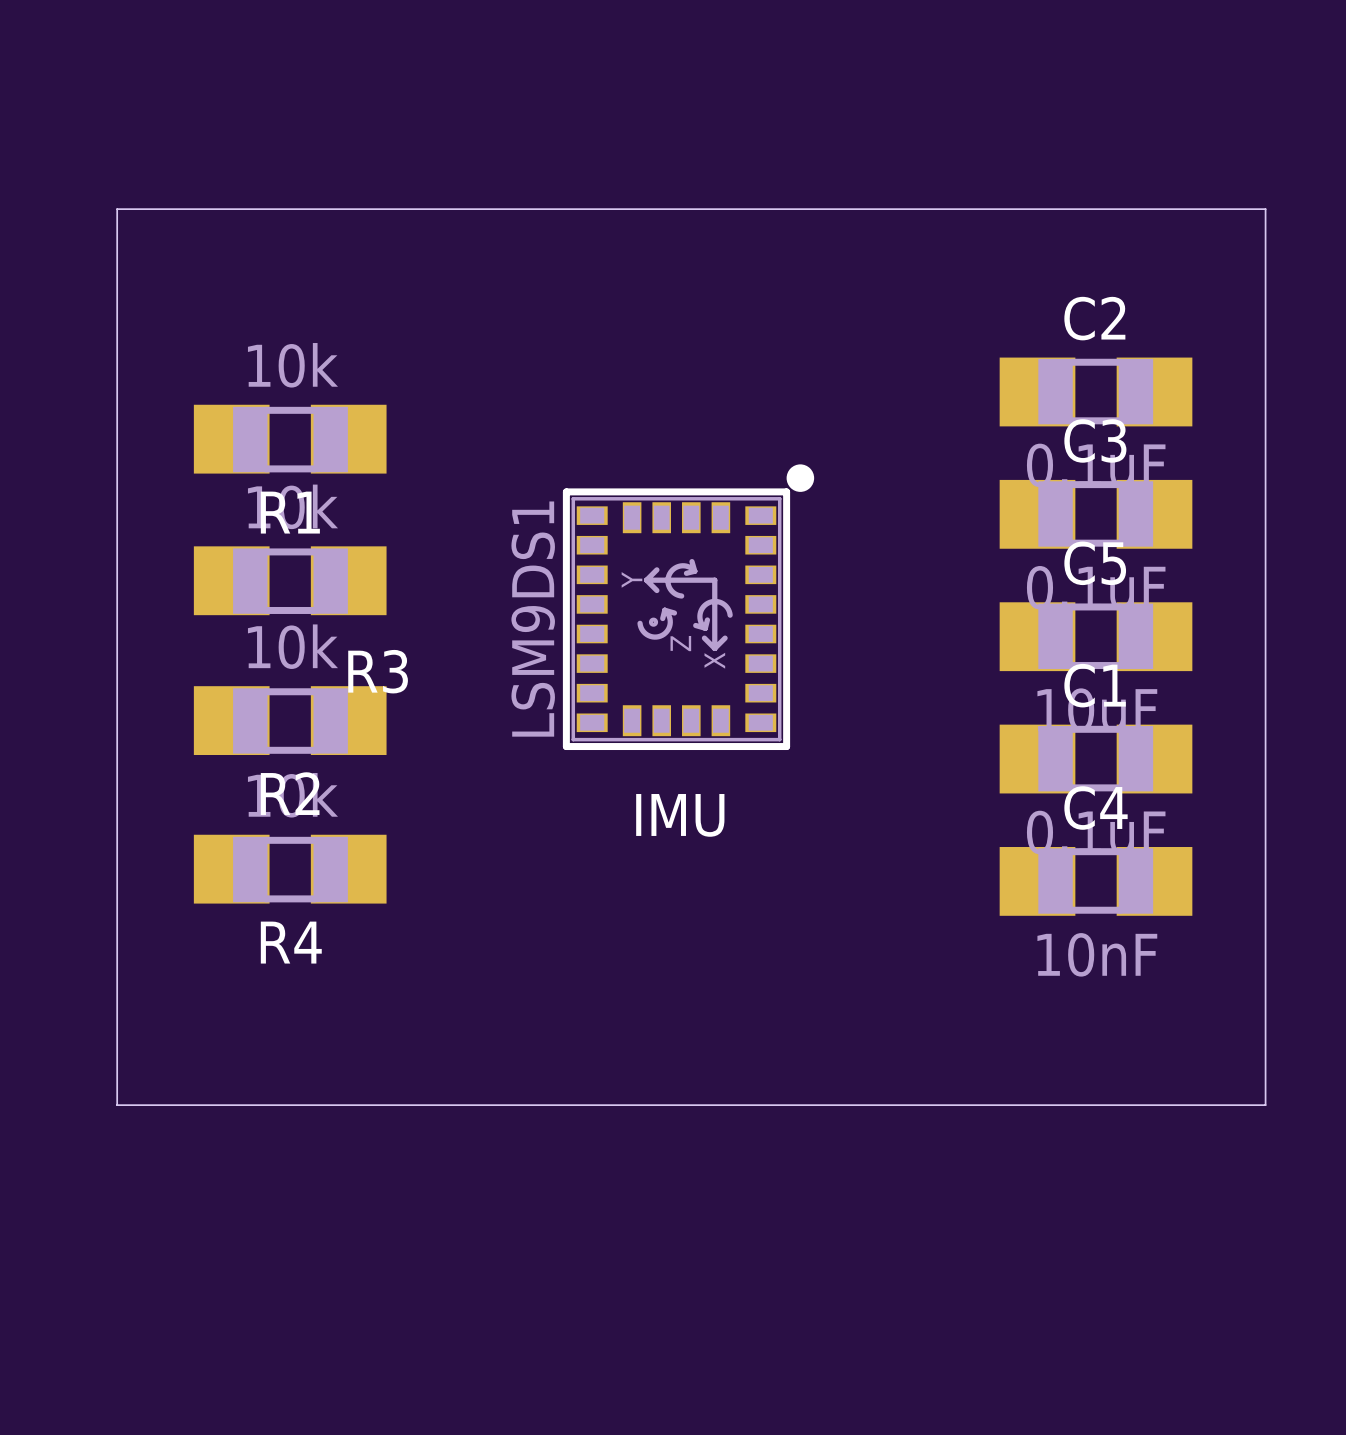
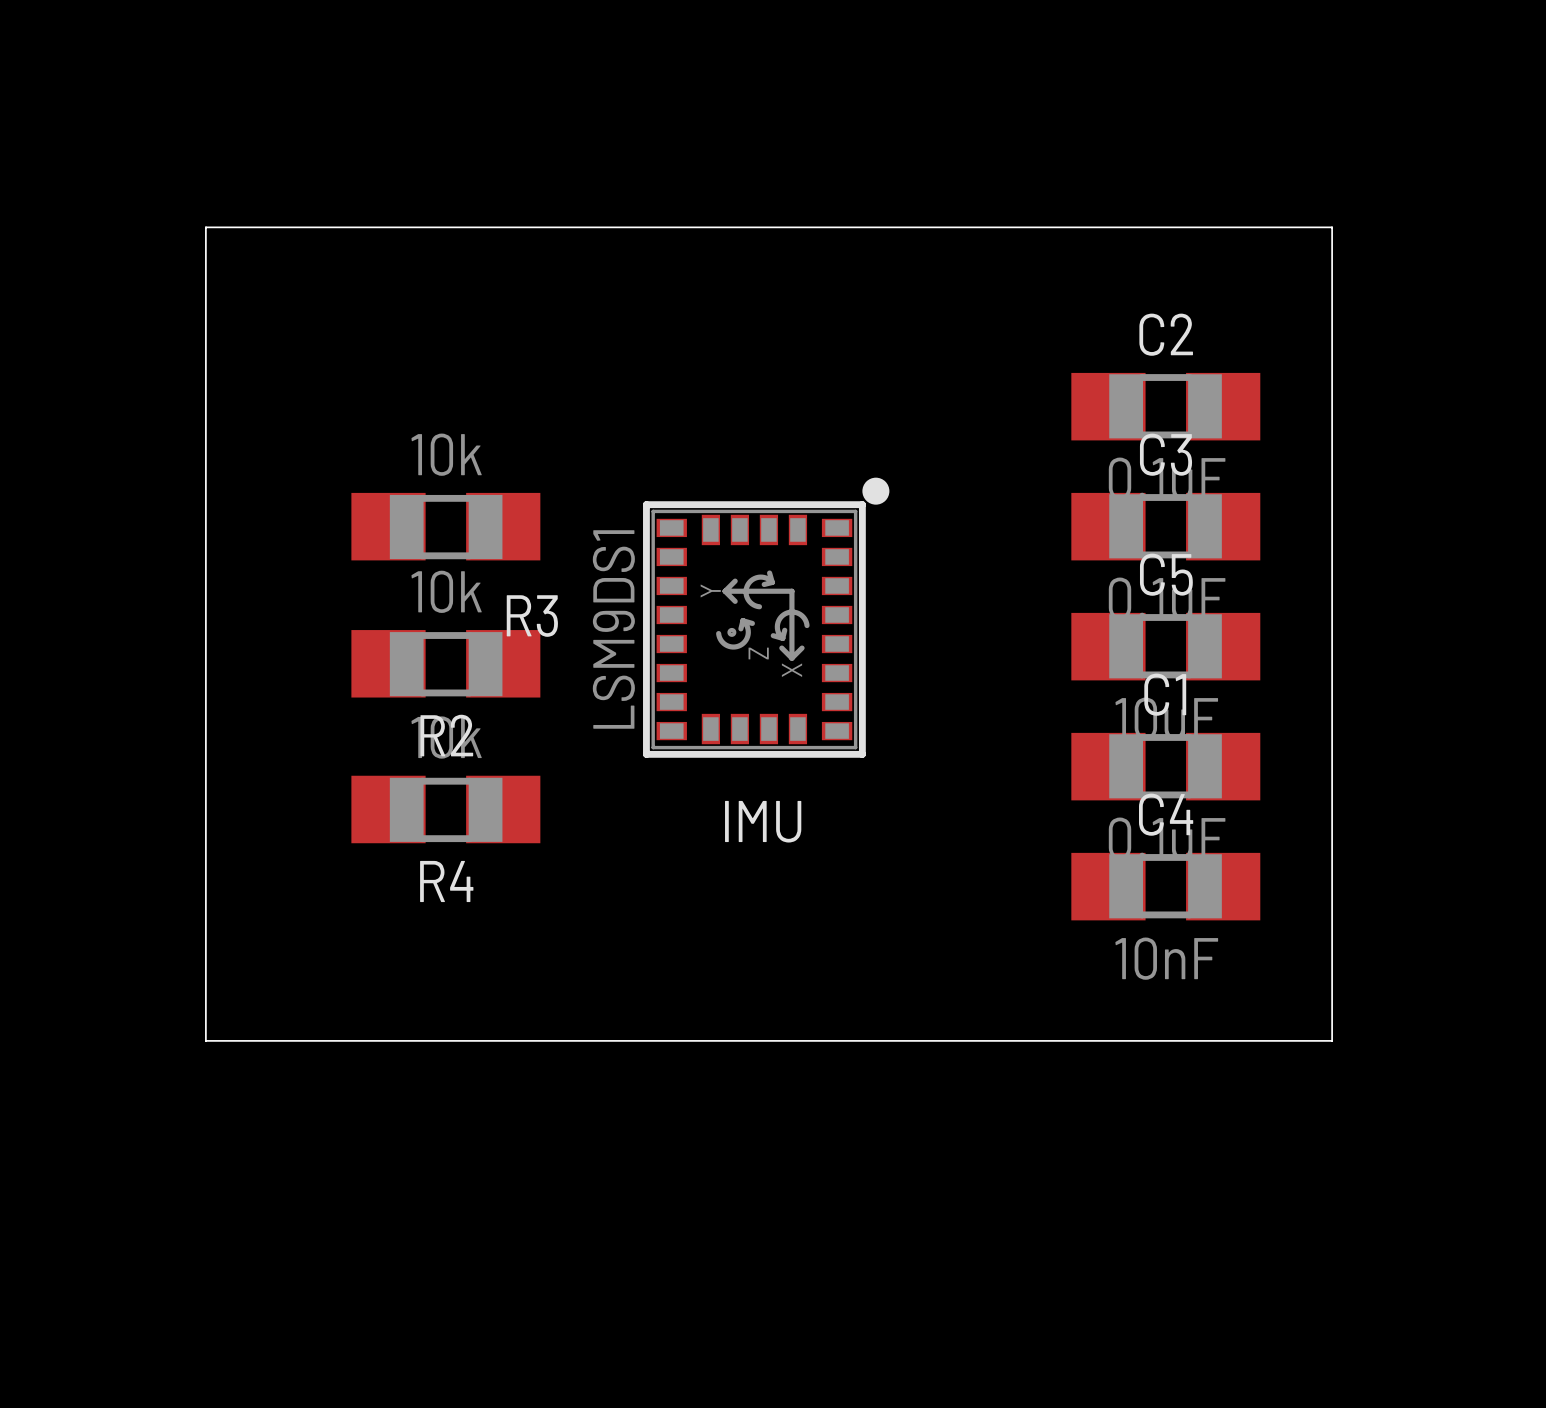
R1: 10k (290, 439) -> none
R3 position: (290, 580) -> (445, 526)
R2 position: (290, 720) -> (445, 663)
R4 position: (290, 869) -> (445, 809)
board edge: (117, 1038) (117, 1105) (1265, 1105) (1265, 1038) -> (205, 1040) (1332, 1040)

